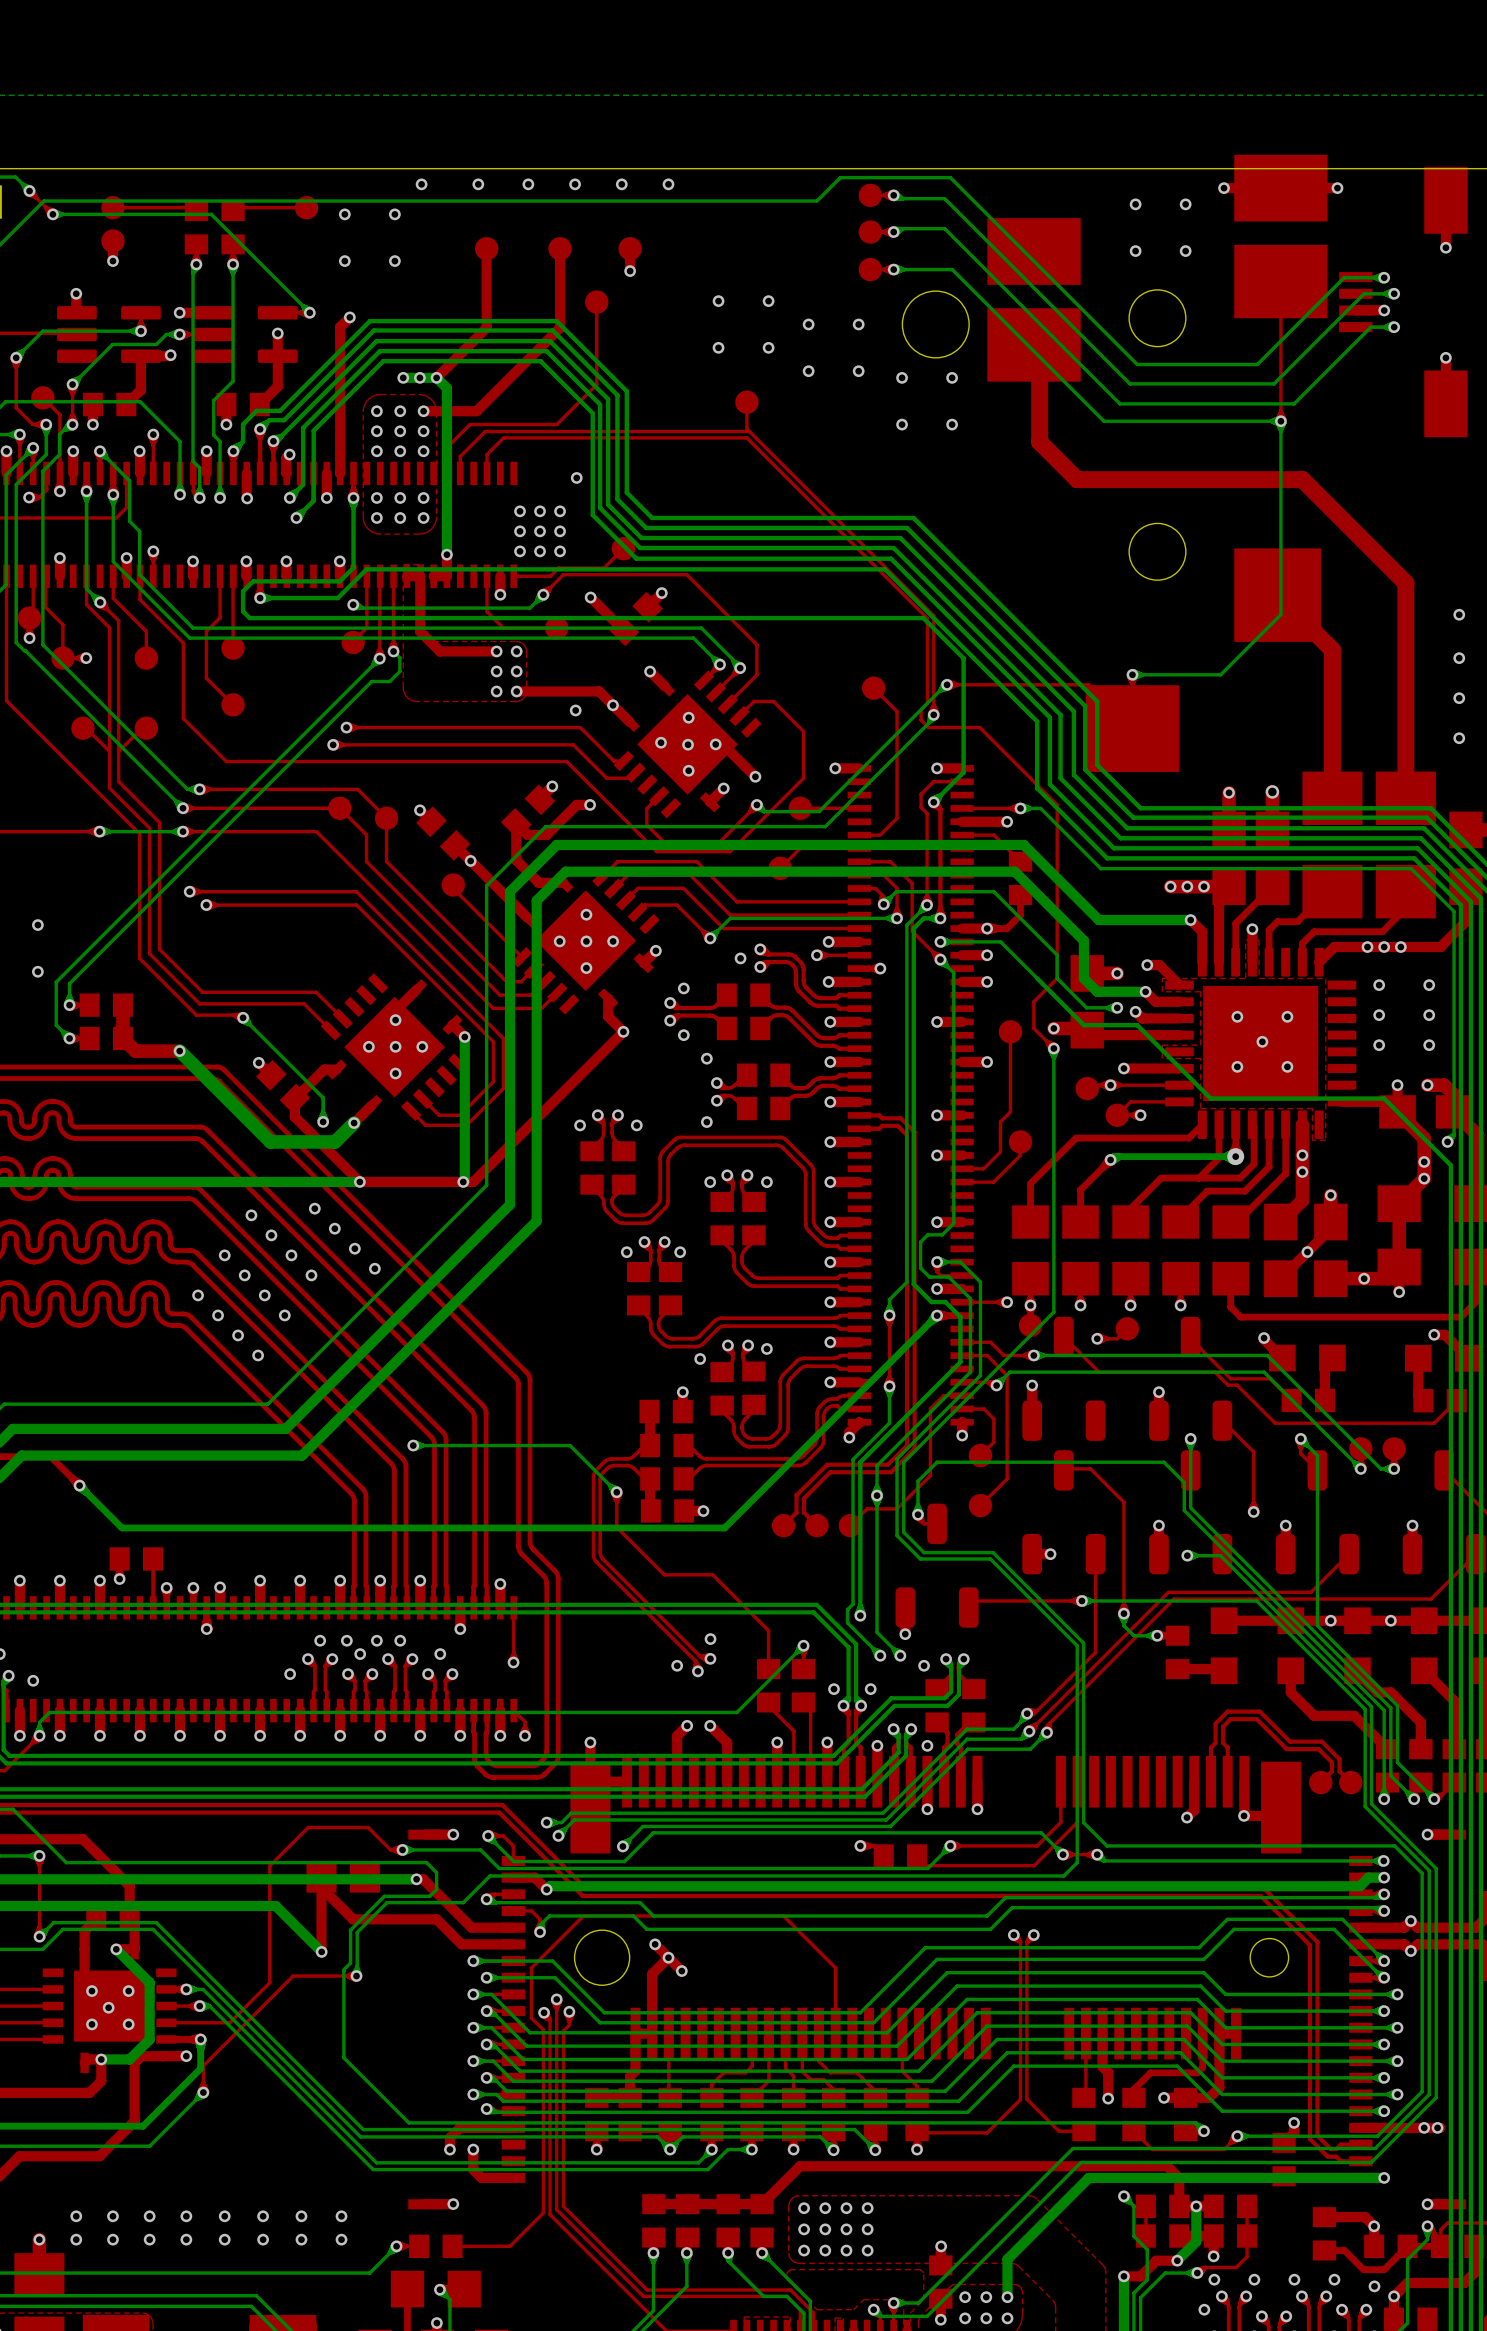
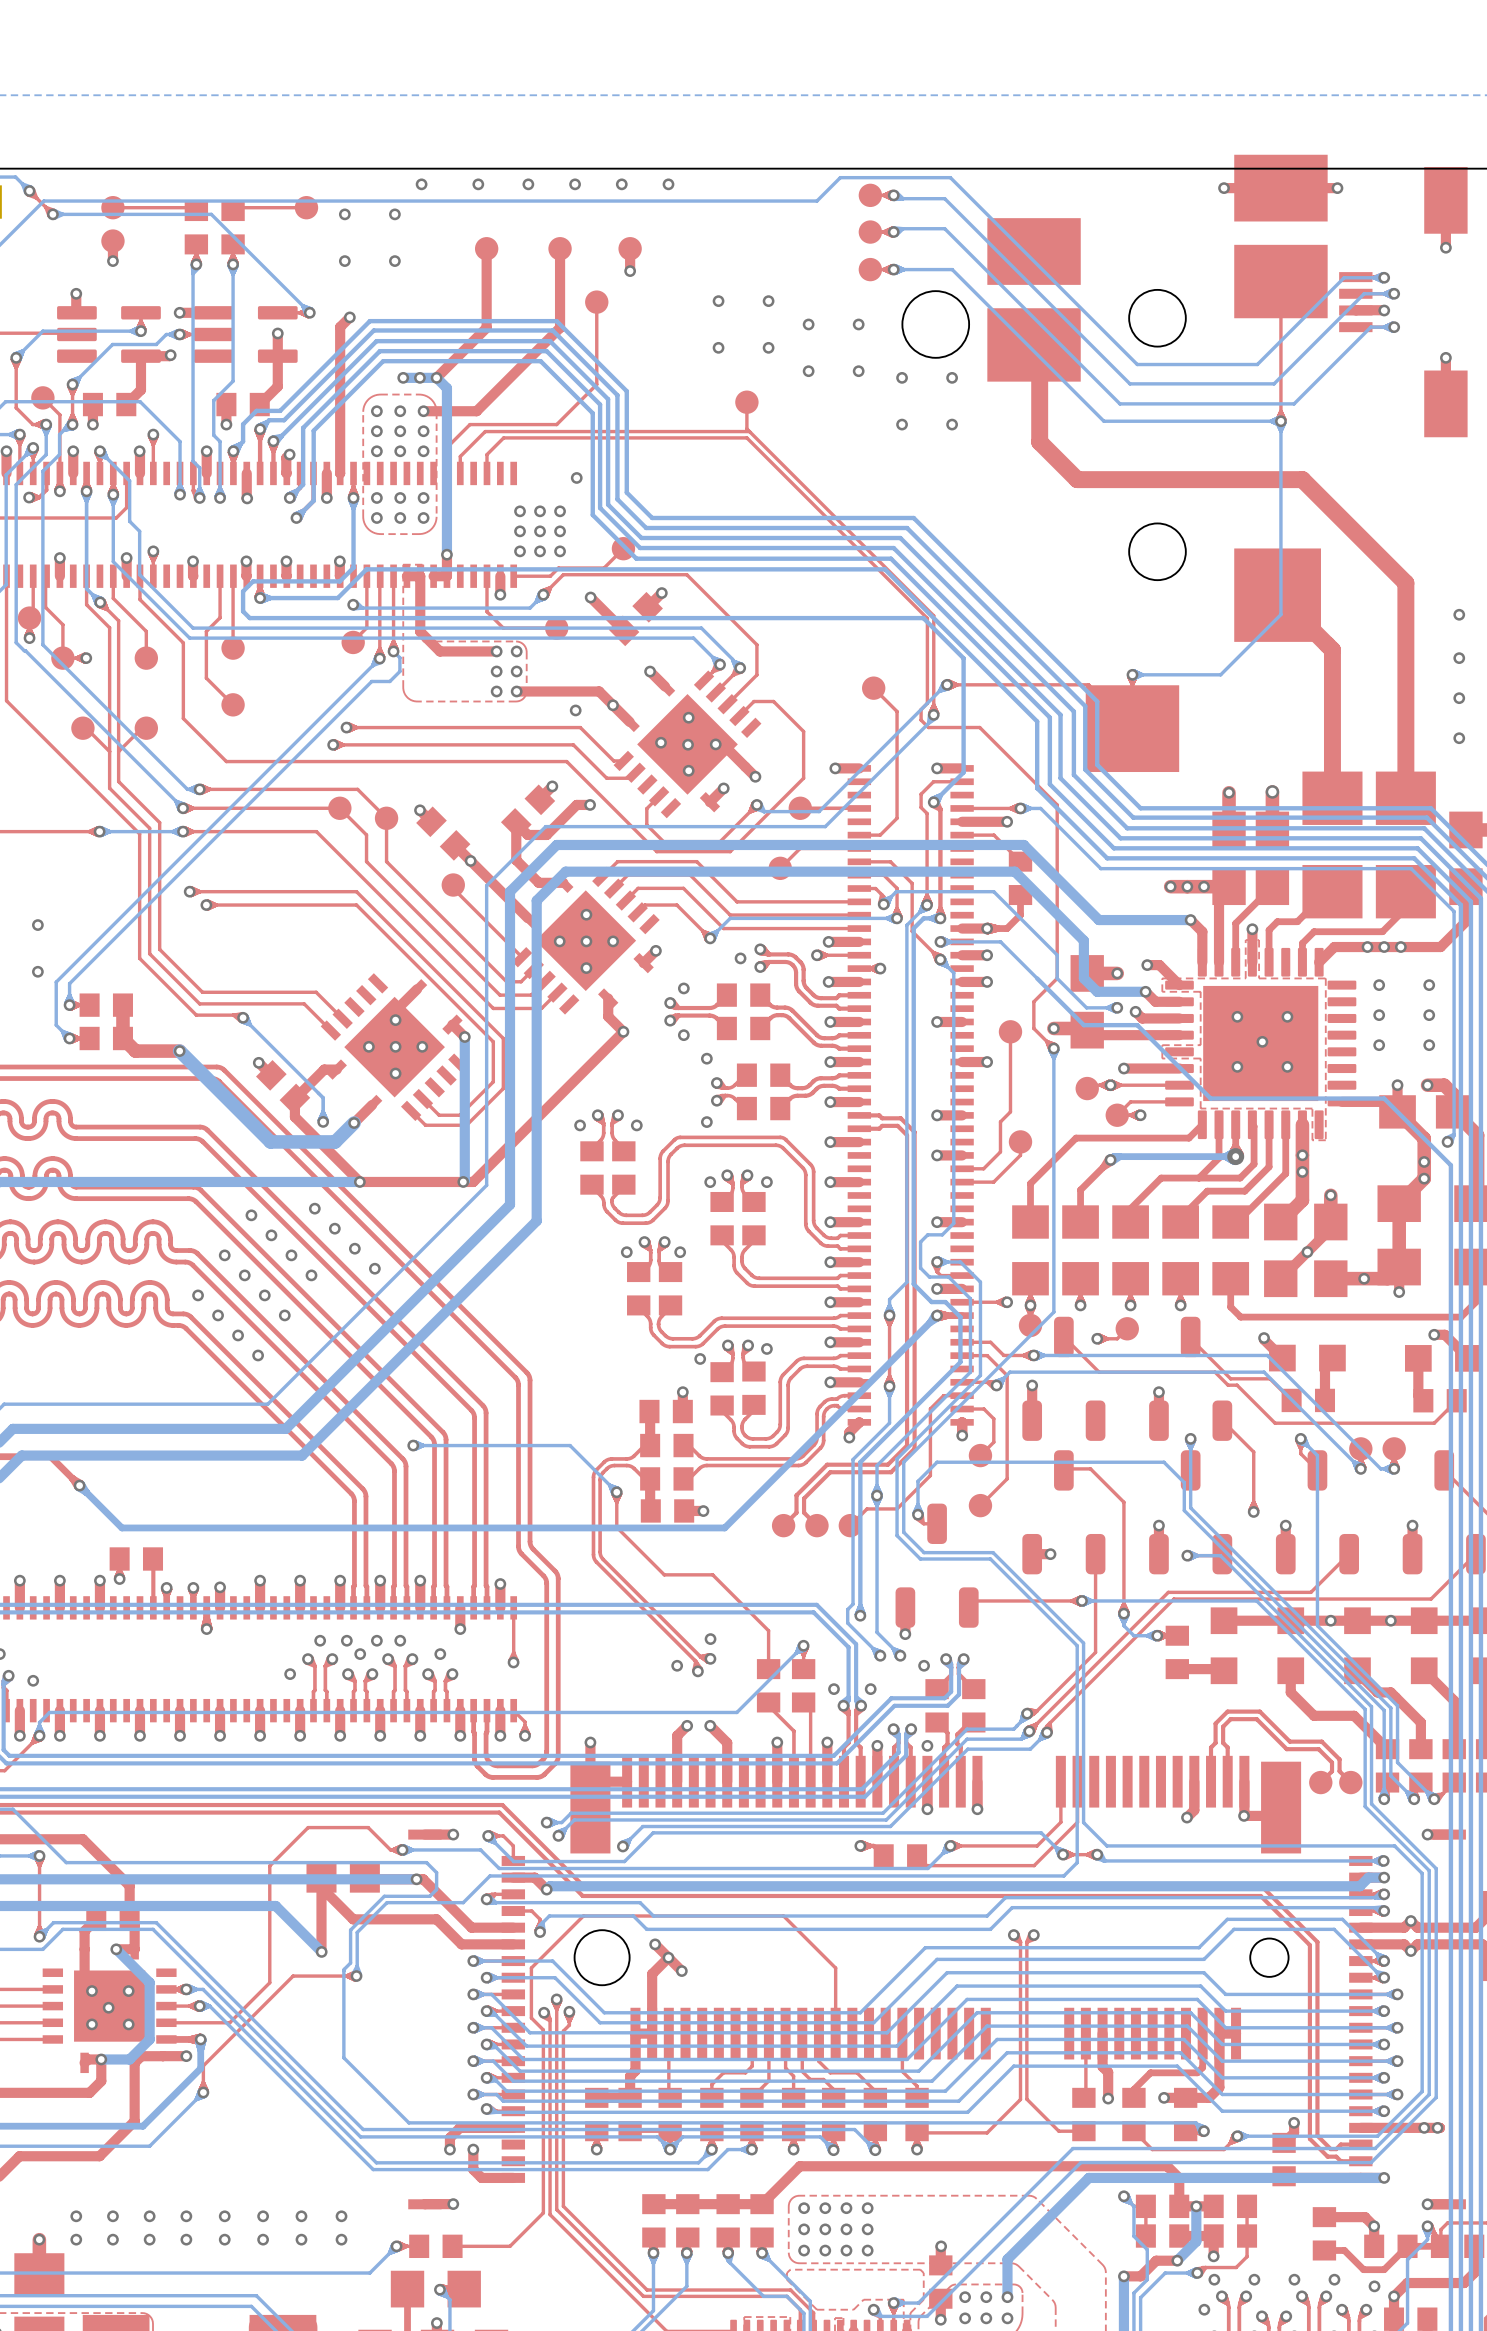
via: (1135, 204) -> none
via: (1185, 204) -> none
via: (1135, 251) -> none
via: (1185, 251) -> none

